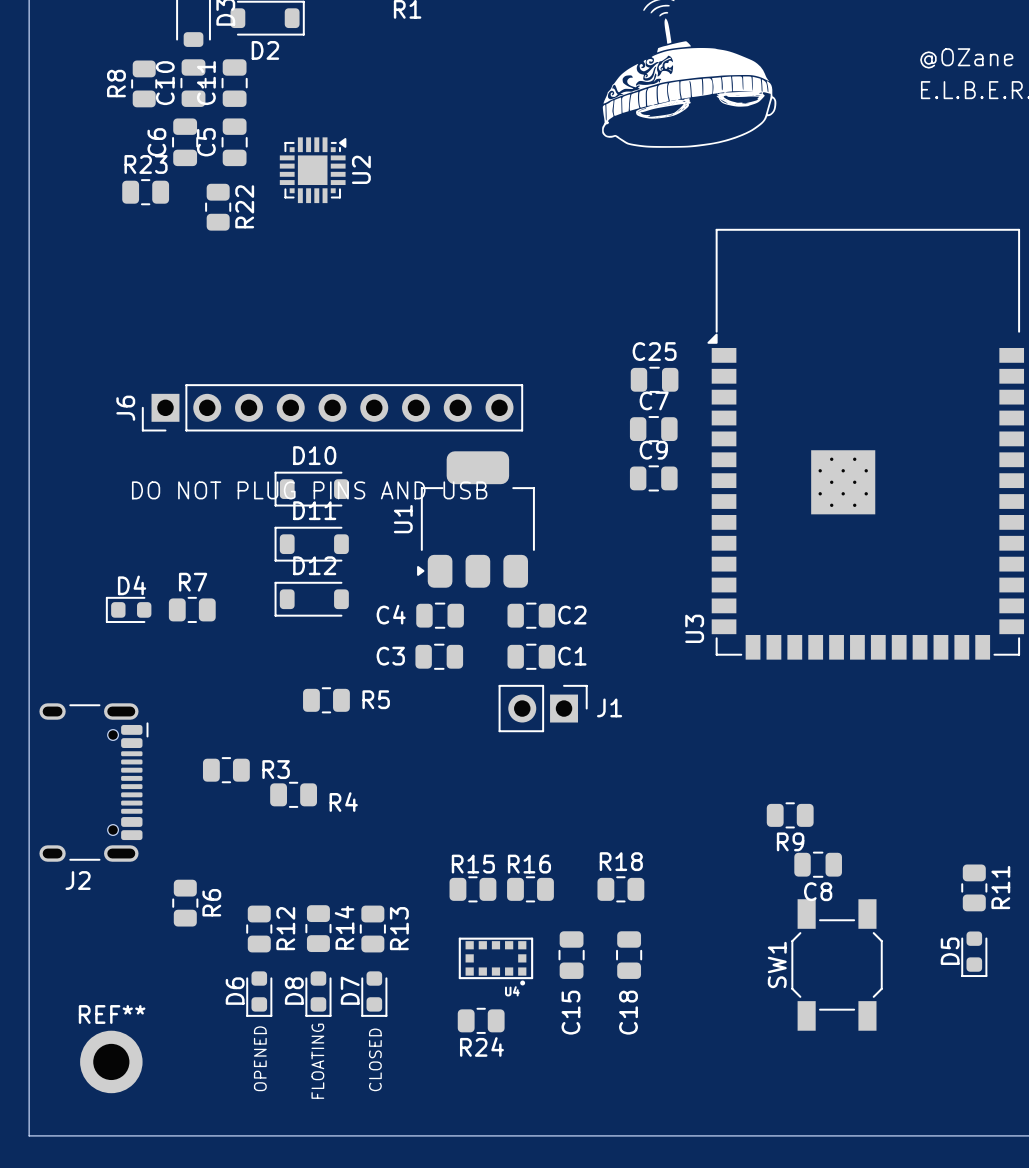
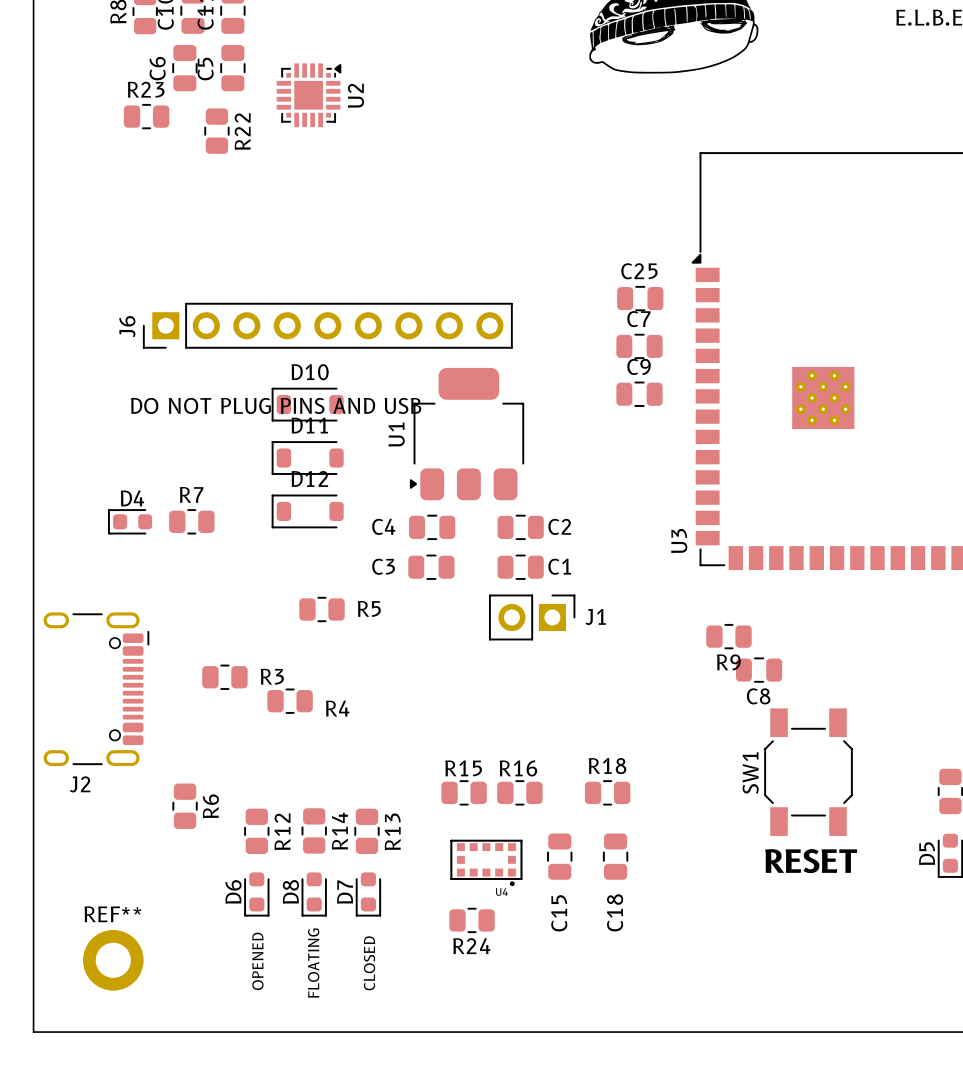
R9 position: (790, 815) -> (728, 636)
C8 position: (818, 864) -> (759, 670)
text: none -> RESET (811, 861)
SW1 position: (837, 964) -> (808, 772)

